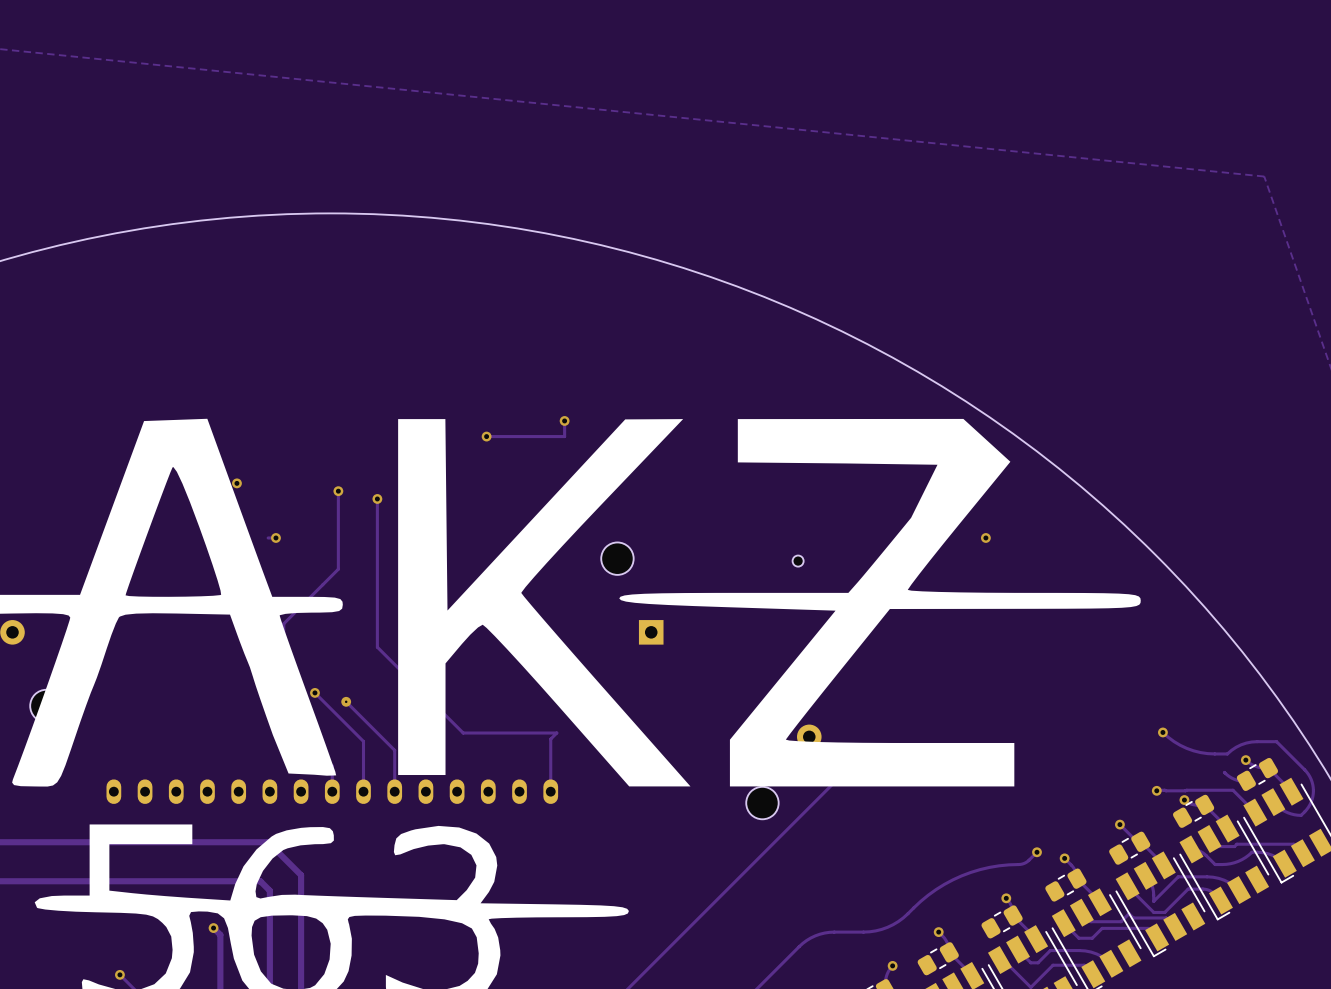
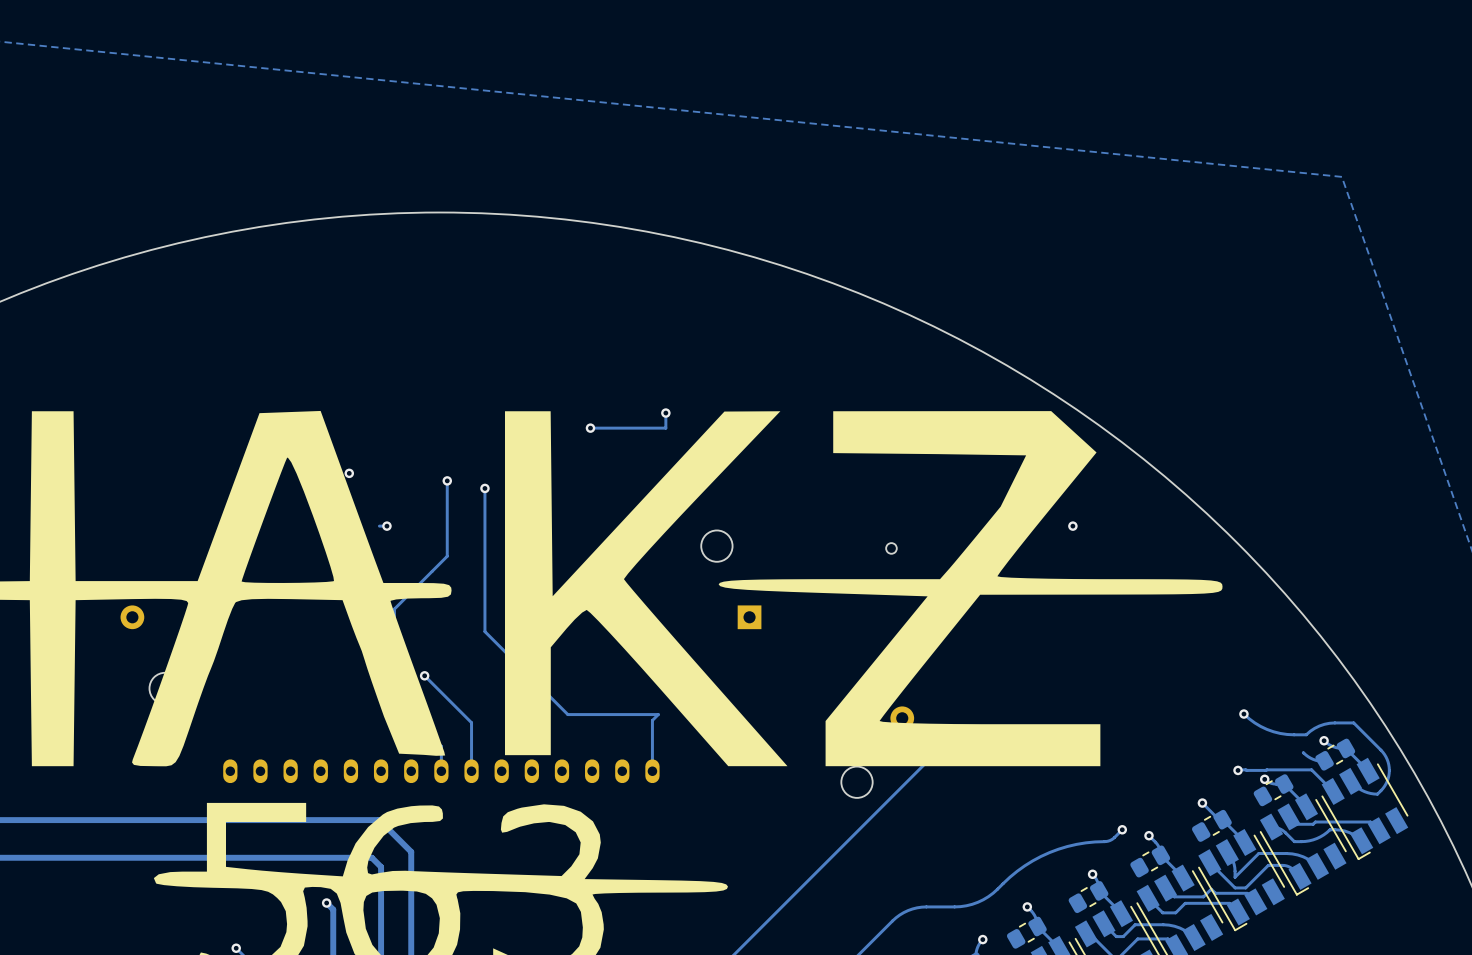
track: (346, 701) (394, 750) (394, 791) -> none
via: (346, 701) -> none

